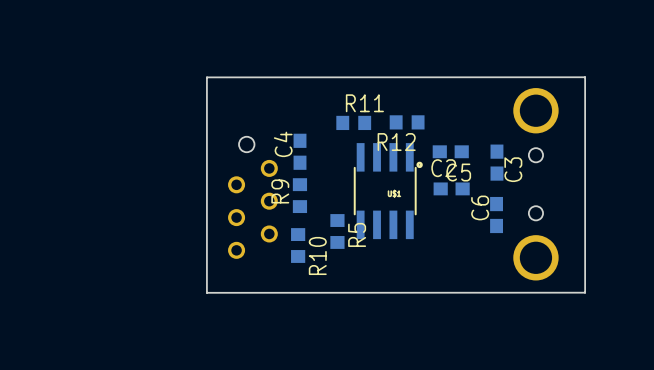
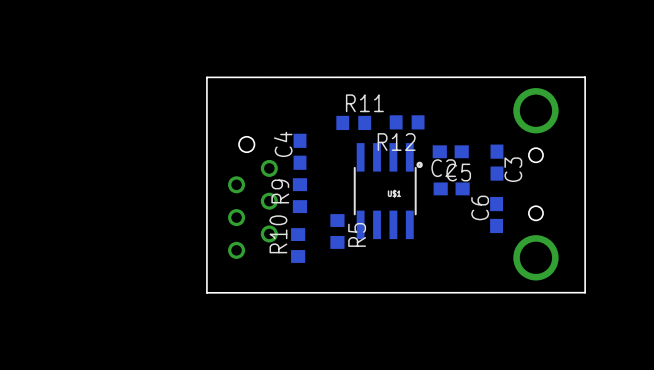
R10 name position: R10 (317, 255) -> R10 (278, 234)

